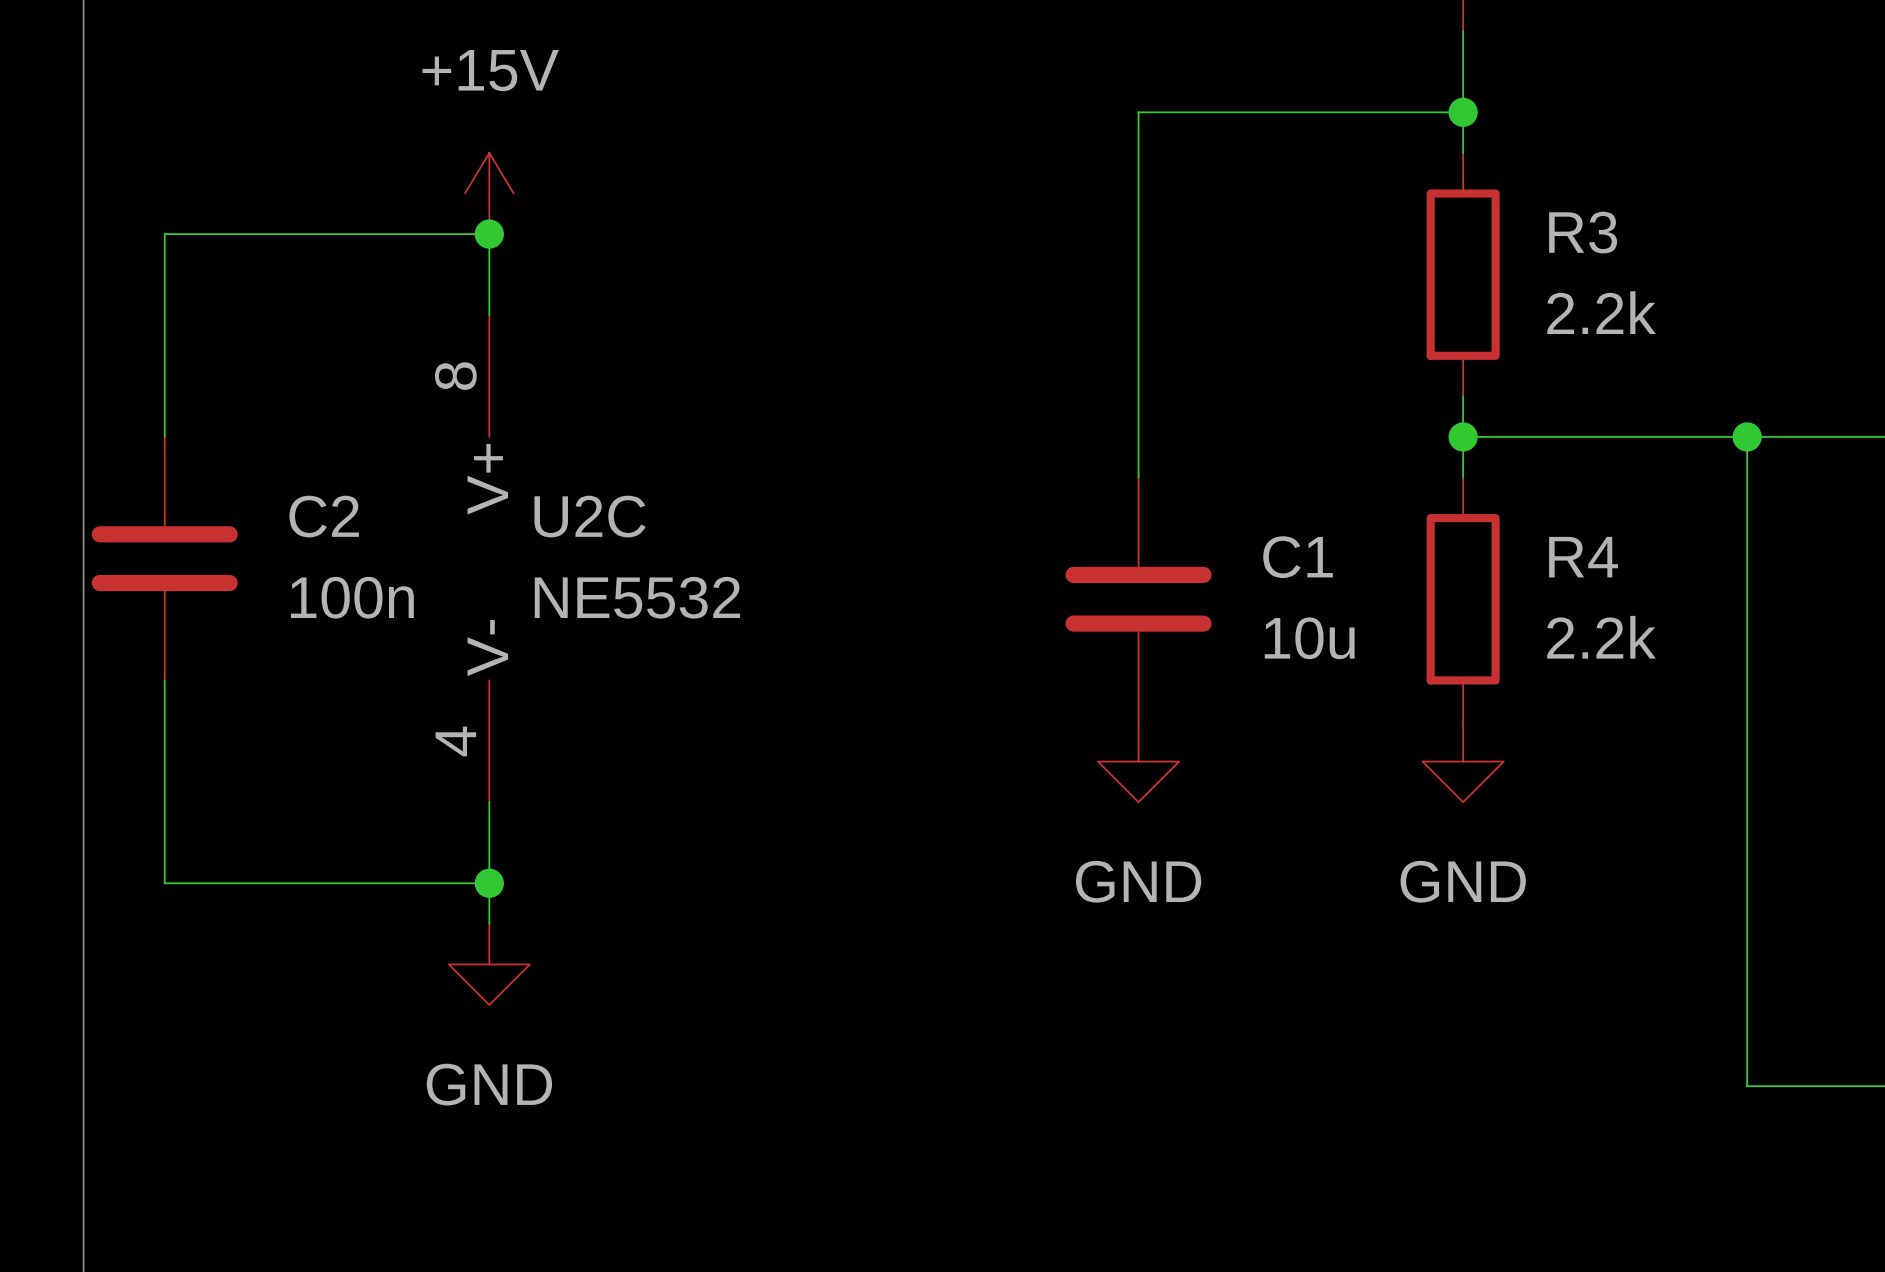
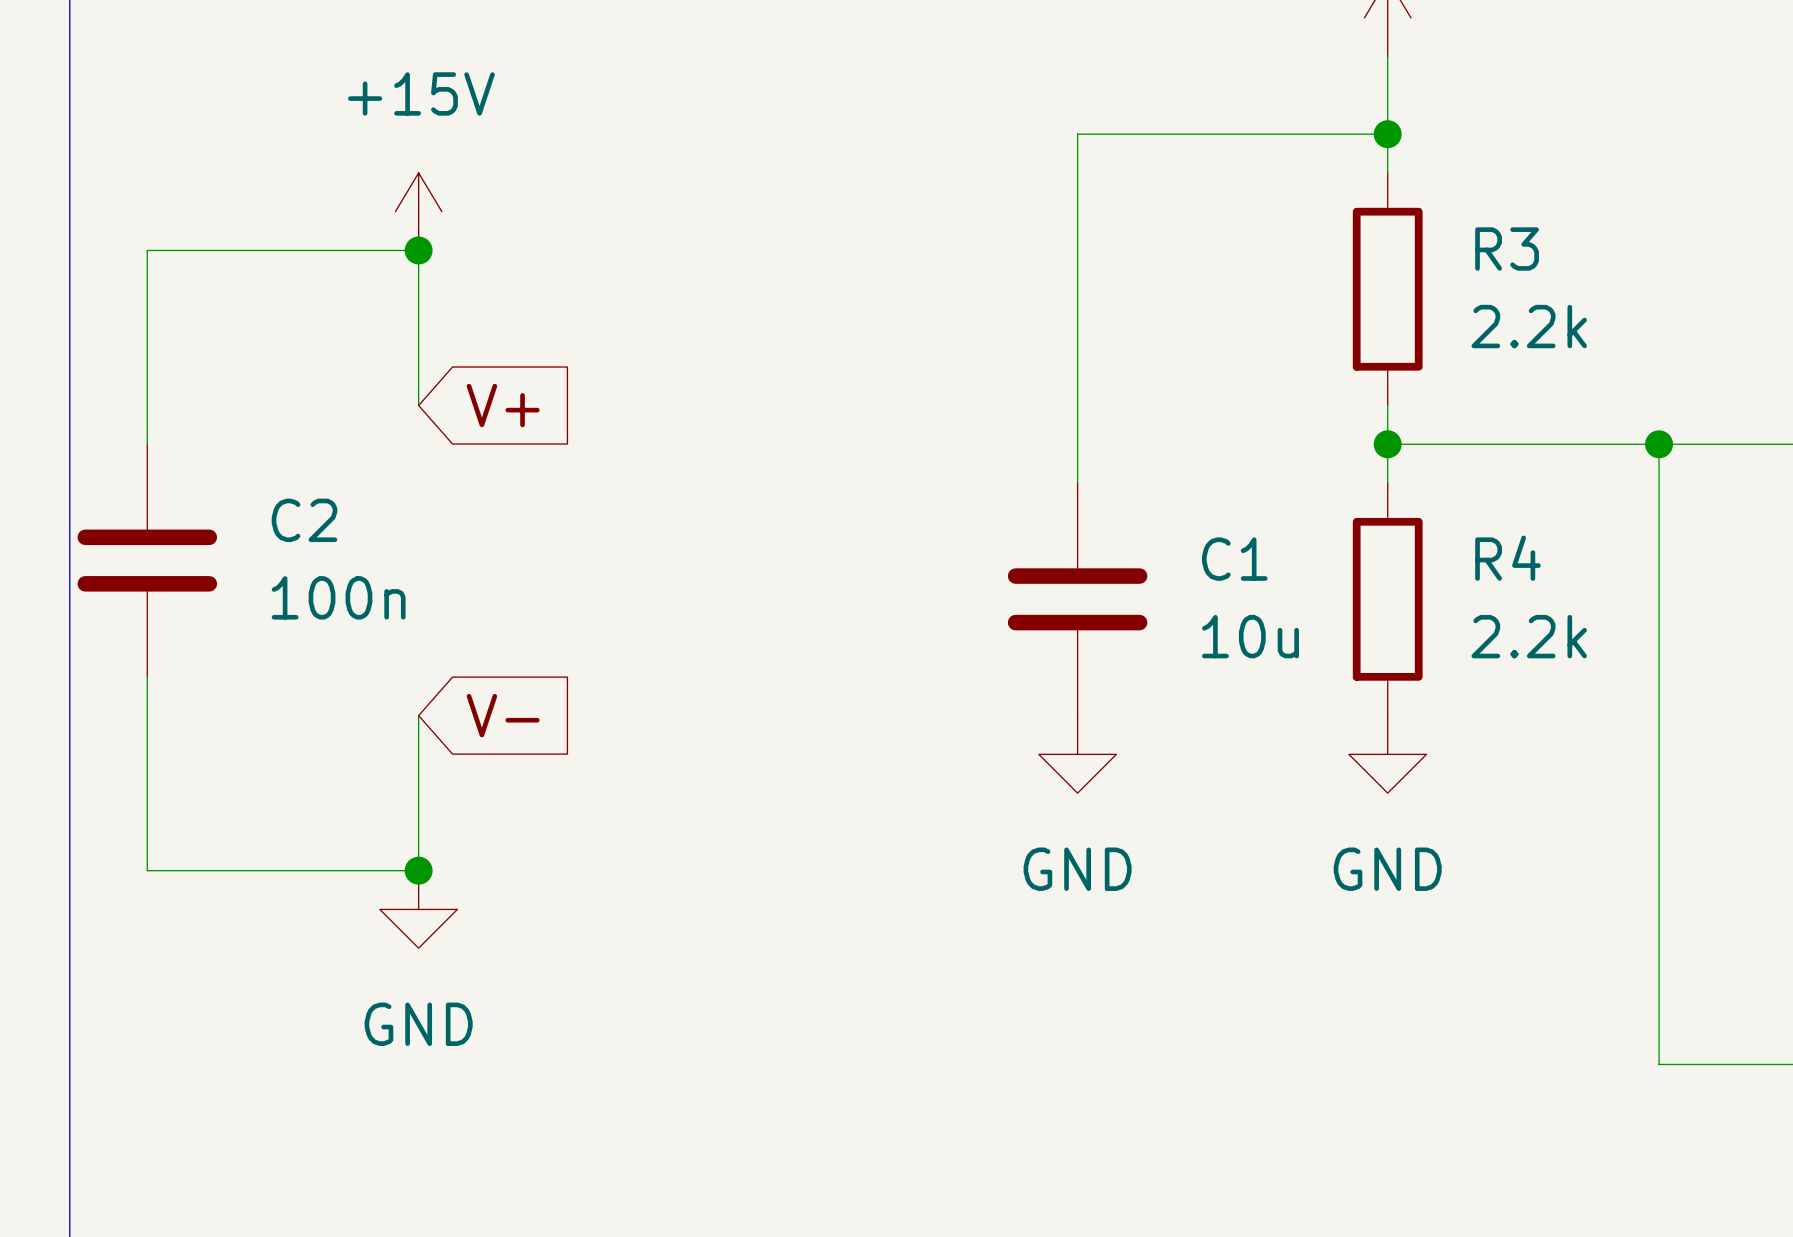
power symbol position: +15V (489, 193) -> +15V (418, 211)
wire: (448, 234) (489, 234) (489, 315) -> (418, 250) (418, 405)
junction position: (489, 234) -> (418, 250)
global label: none -> V+ (503, 405)
U2C: NE5532 (489, 558) -> none
global label: none -> V- (503, 715)
wire: (489, 802) (489, 923) -> none
wire: (448, 883) (489, 883) -> (418, 870) (418, 715)
junction position: (489, 883) -> (418, 870)
power symbol position: GND (489, 964) -> GND (418, 909)

